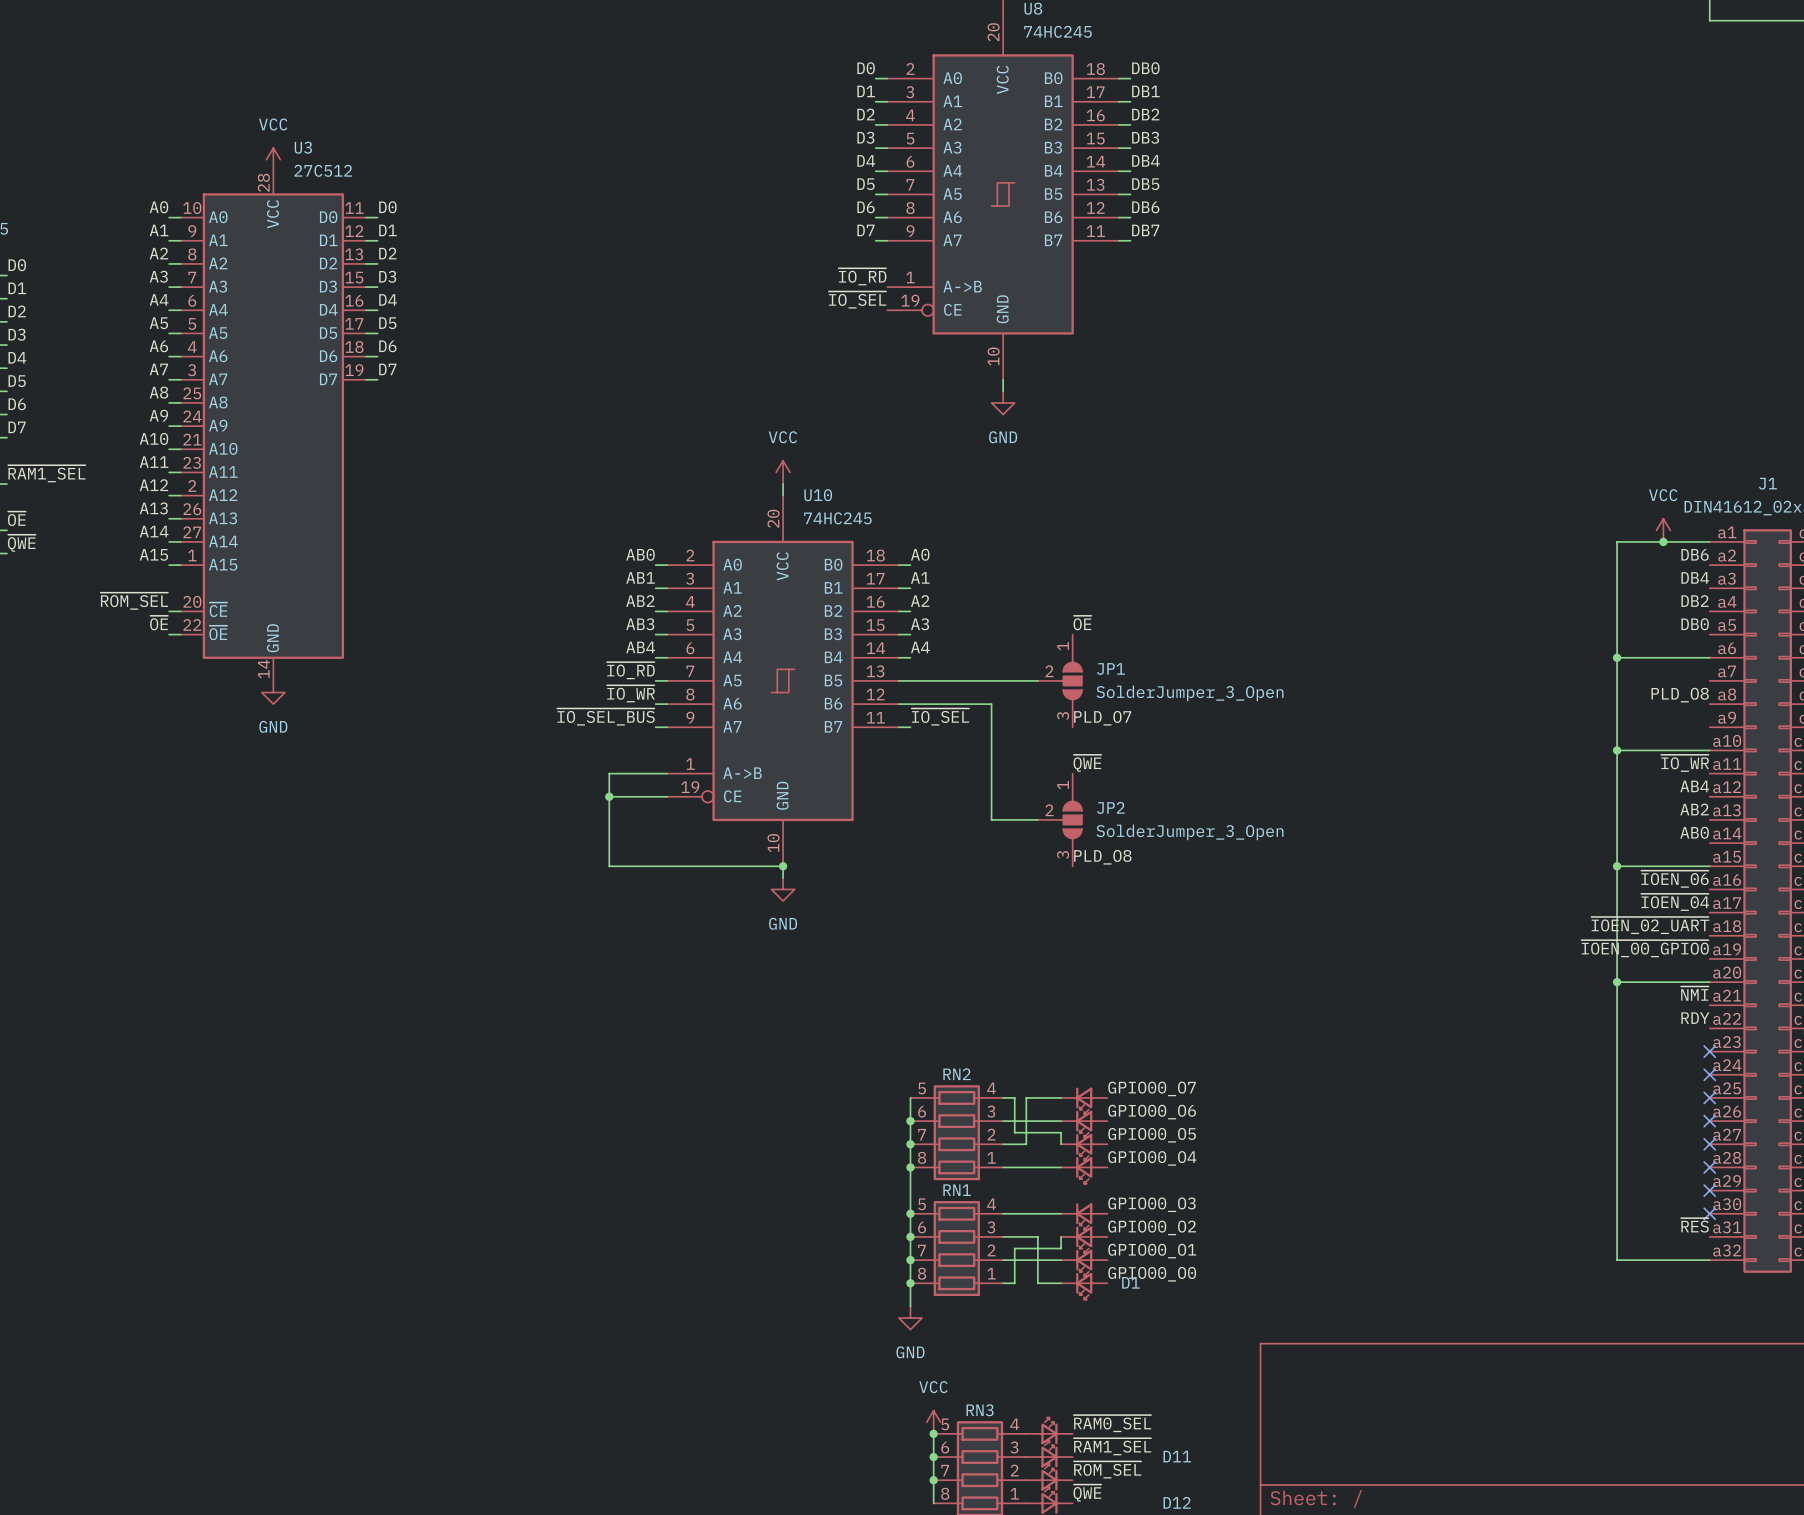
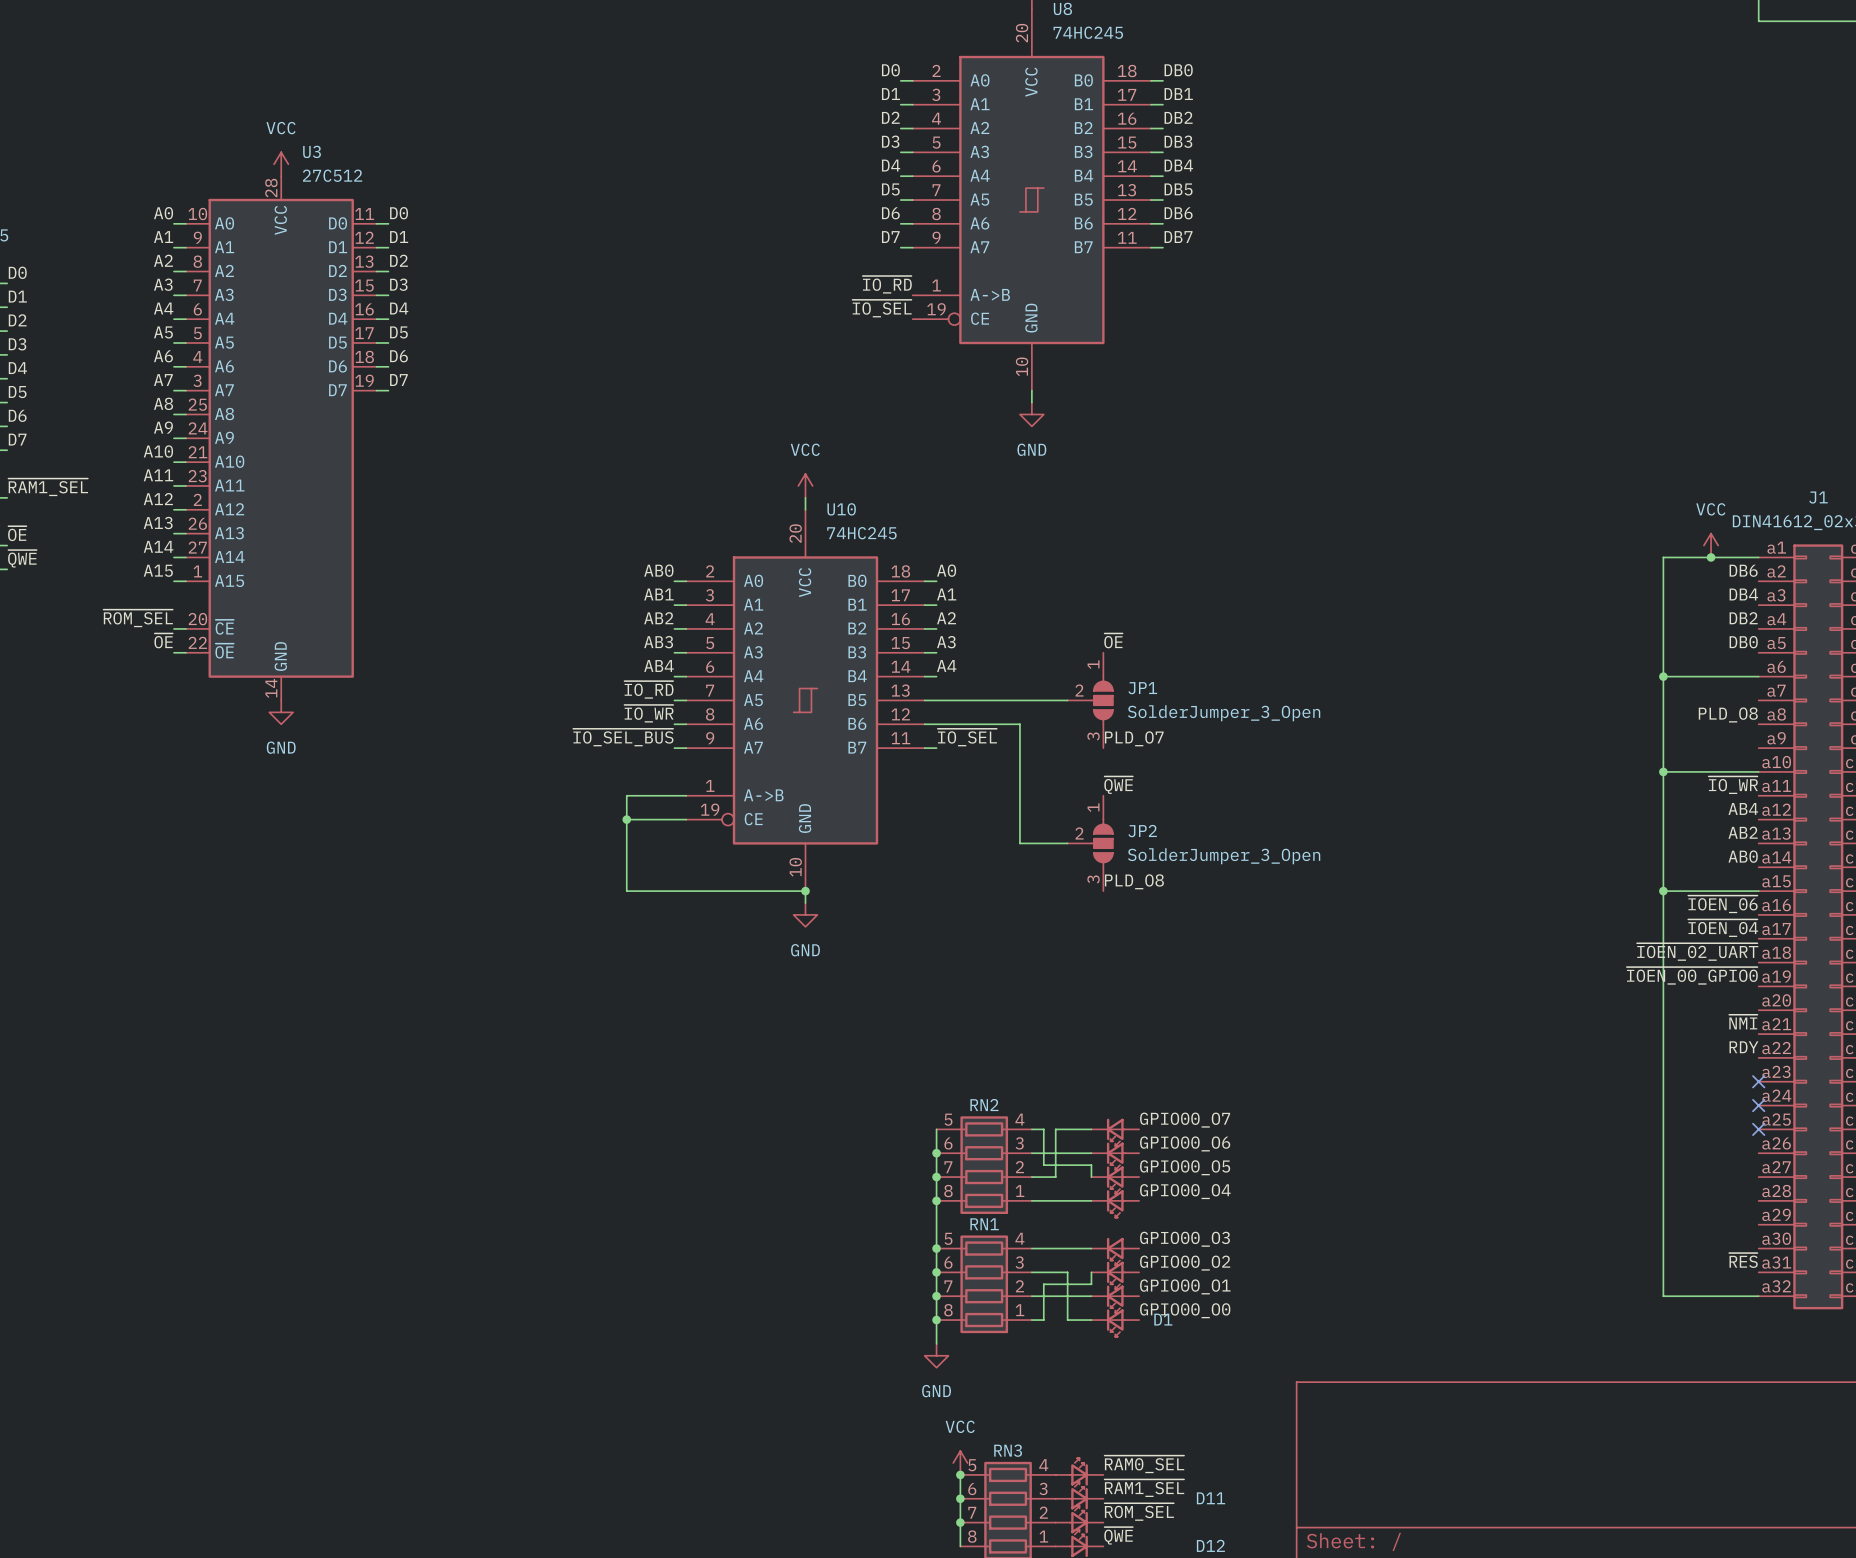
wire: (1617, 982) (1709, 982) -> none
junction: (1617, 982) -> none
no-connect mark: (1709, 1121) -> none
no-connect mark: (1709, 1144) -> none
no-connect mark: (1709, 1167) -> none
no-connect mark: (1709, 1190) -> none
no-connect mark: (1709, 1213) -> none

